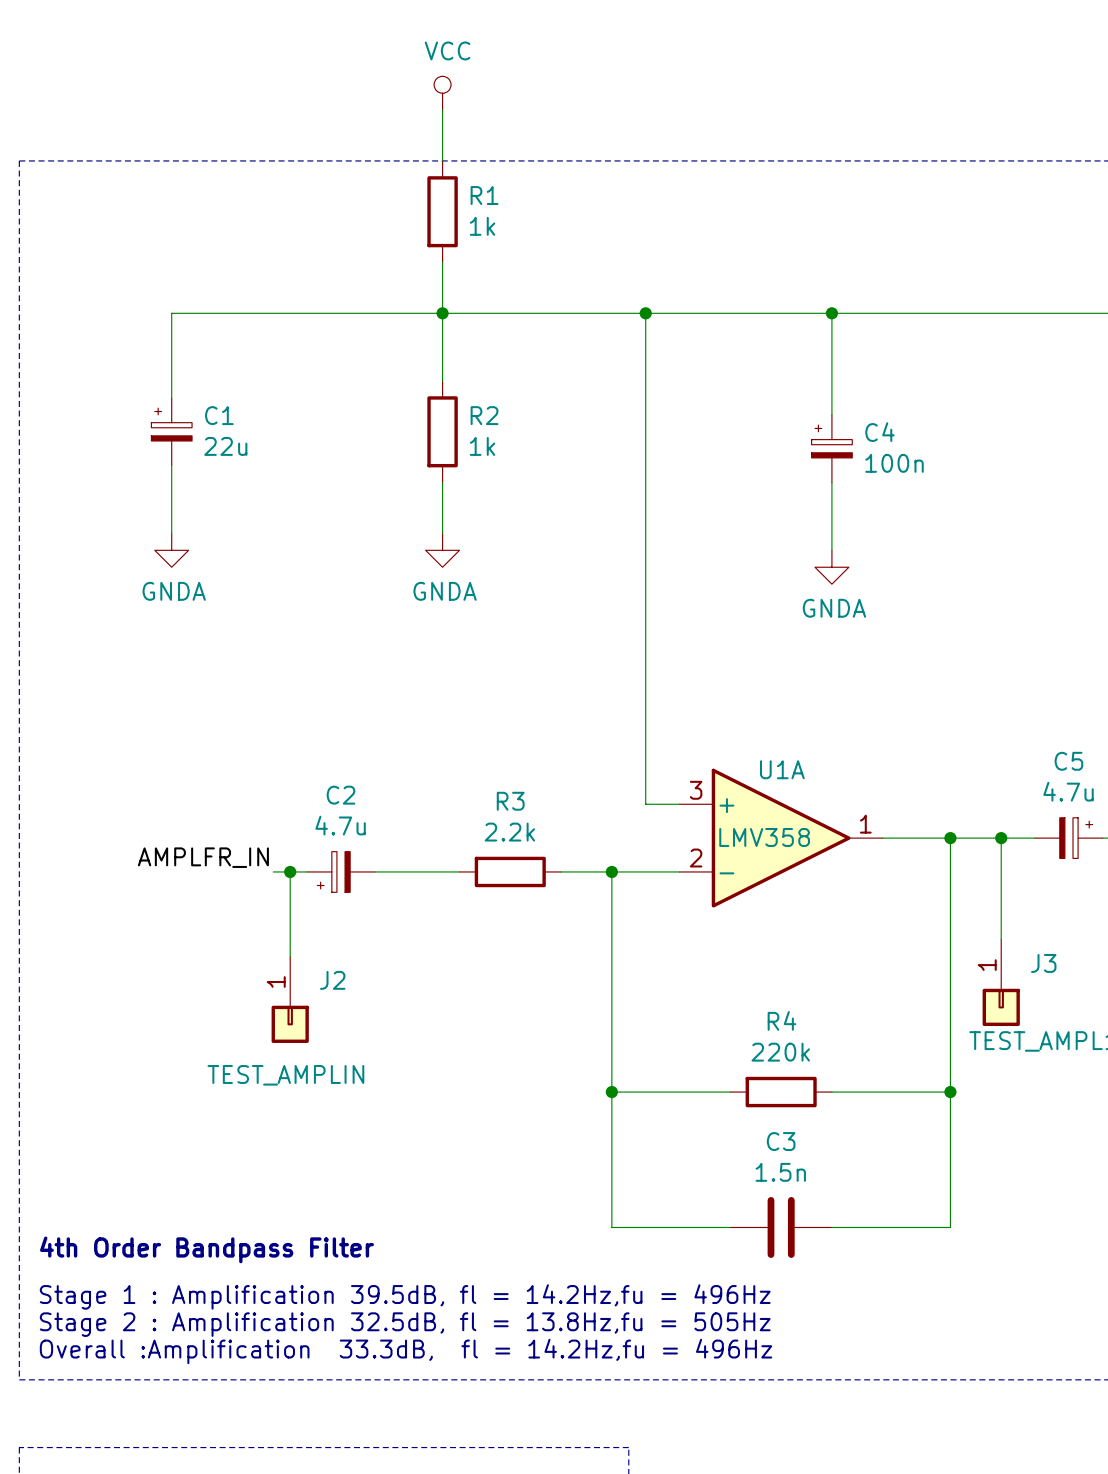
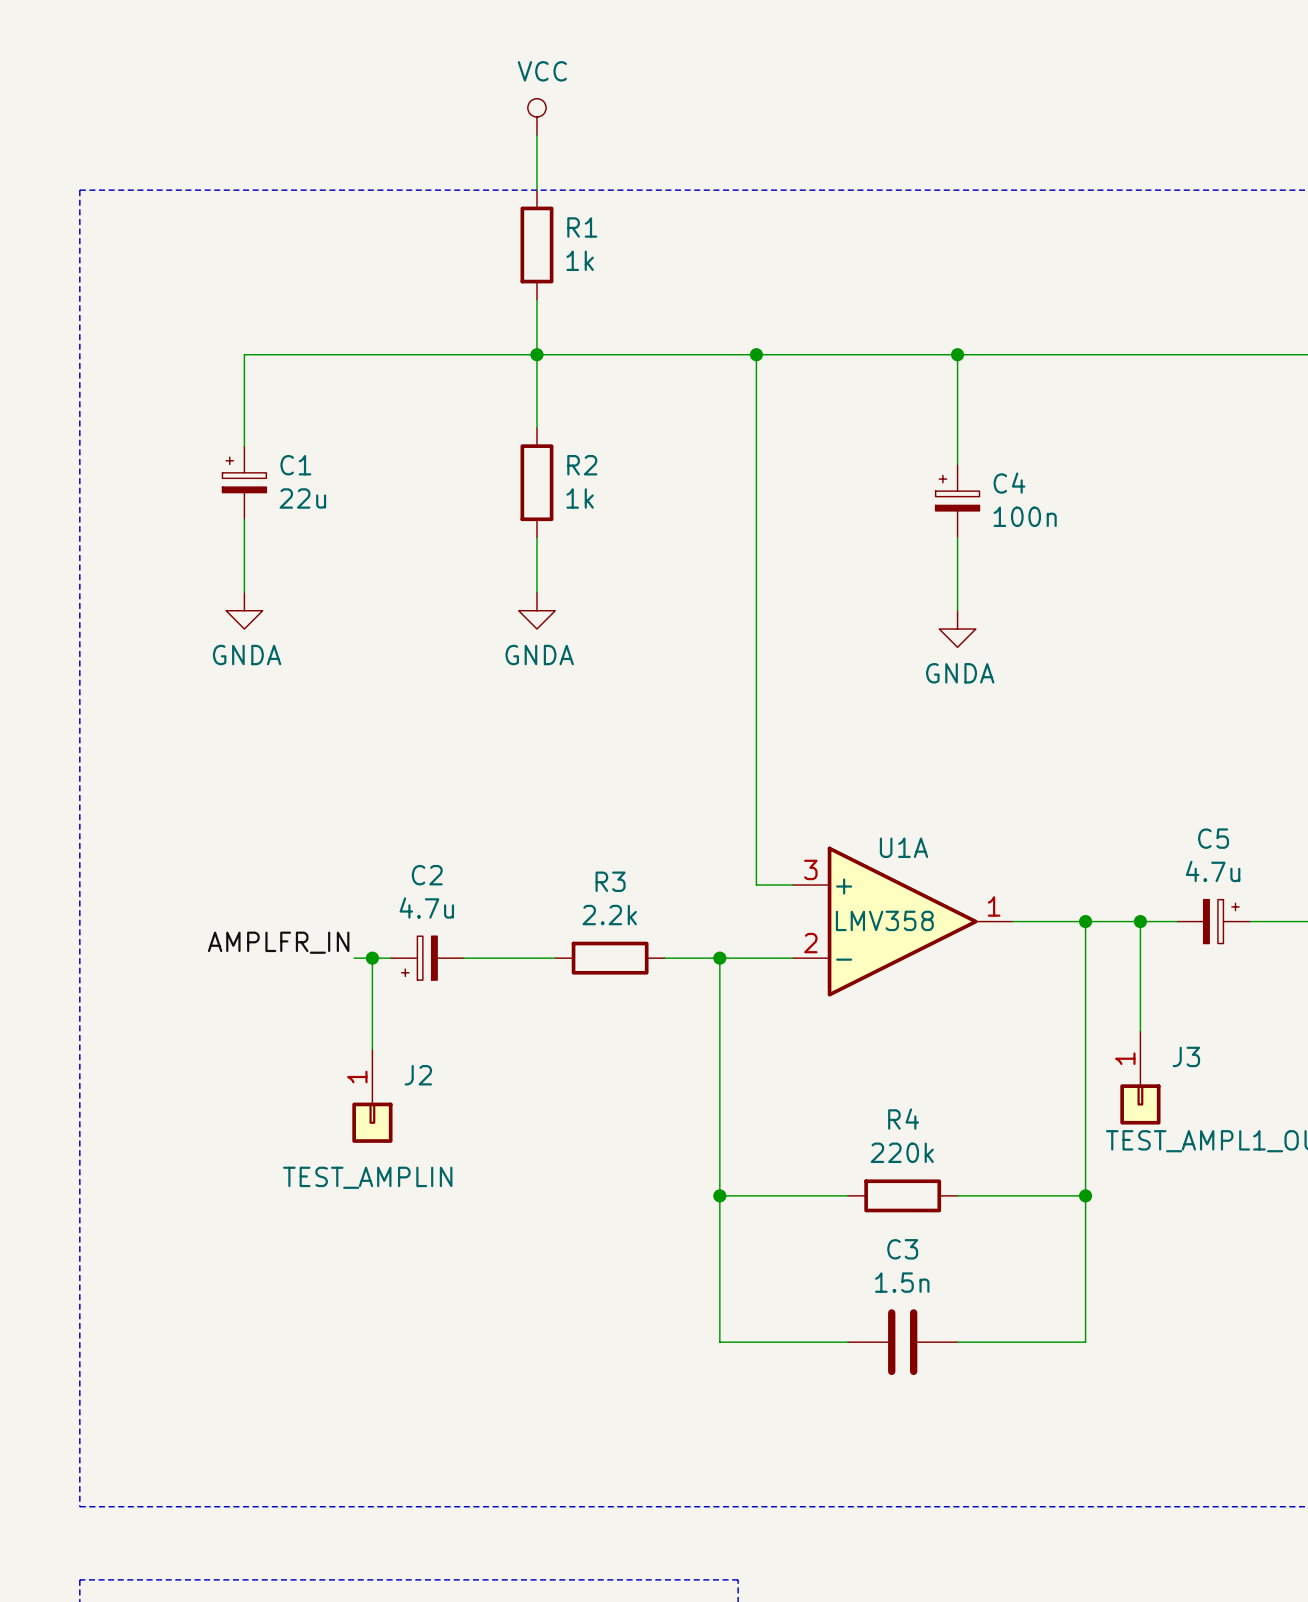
text: 4th Order Bandpass Filter (206, 1249) -> none
text: Stage 1 : Amplification 39.5dB, fl = 14.2Hz,fu = 496Hz (405, 1296) -> none
text: Stage 2 : Amplification 32.5dB, fl = 13.8Hz,fu = 505Hz (405, 1324) -> none
text: Overall :Amplification 33.3dB, fl = 14.2Hz,fu = 496Hz (406, 1351) -> none

